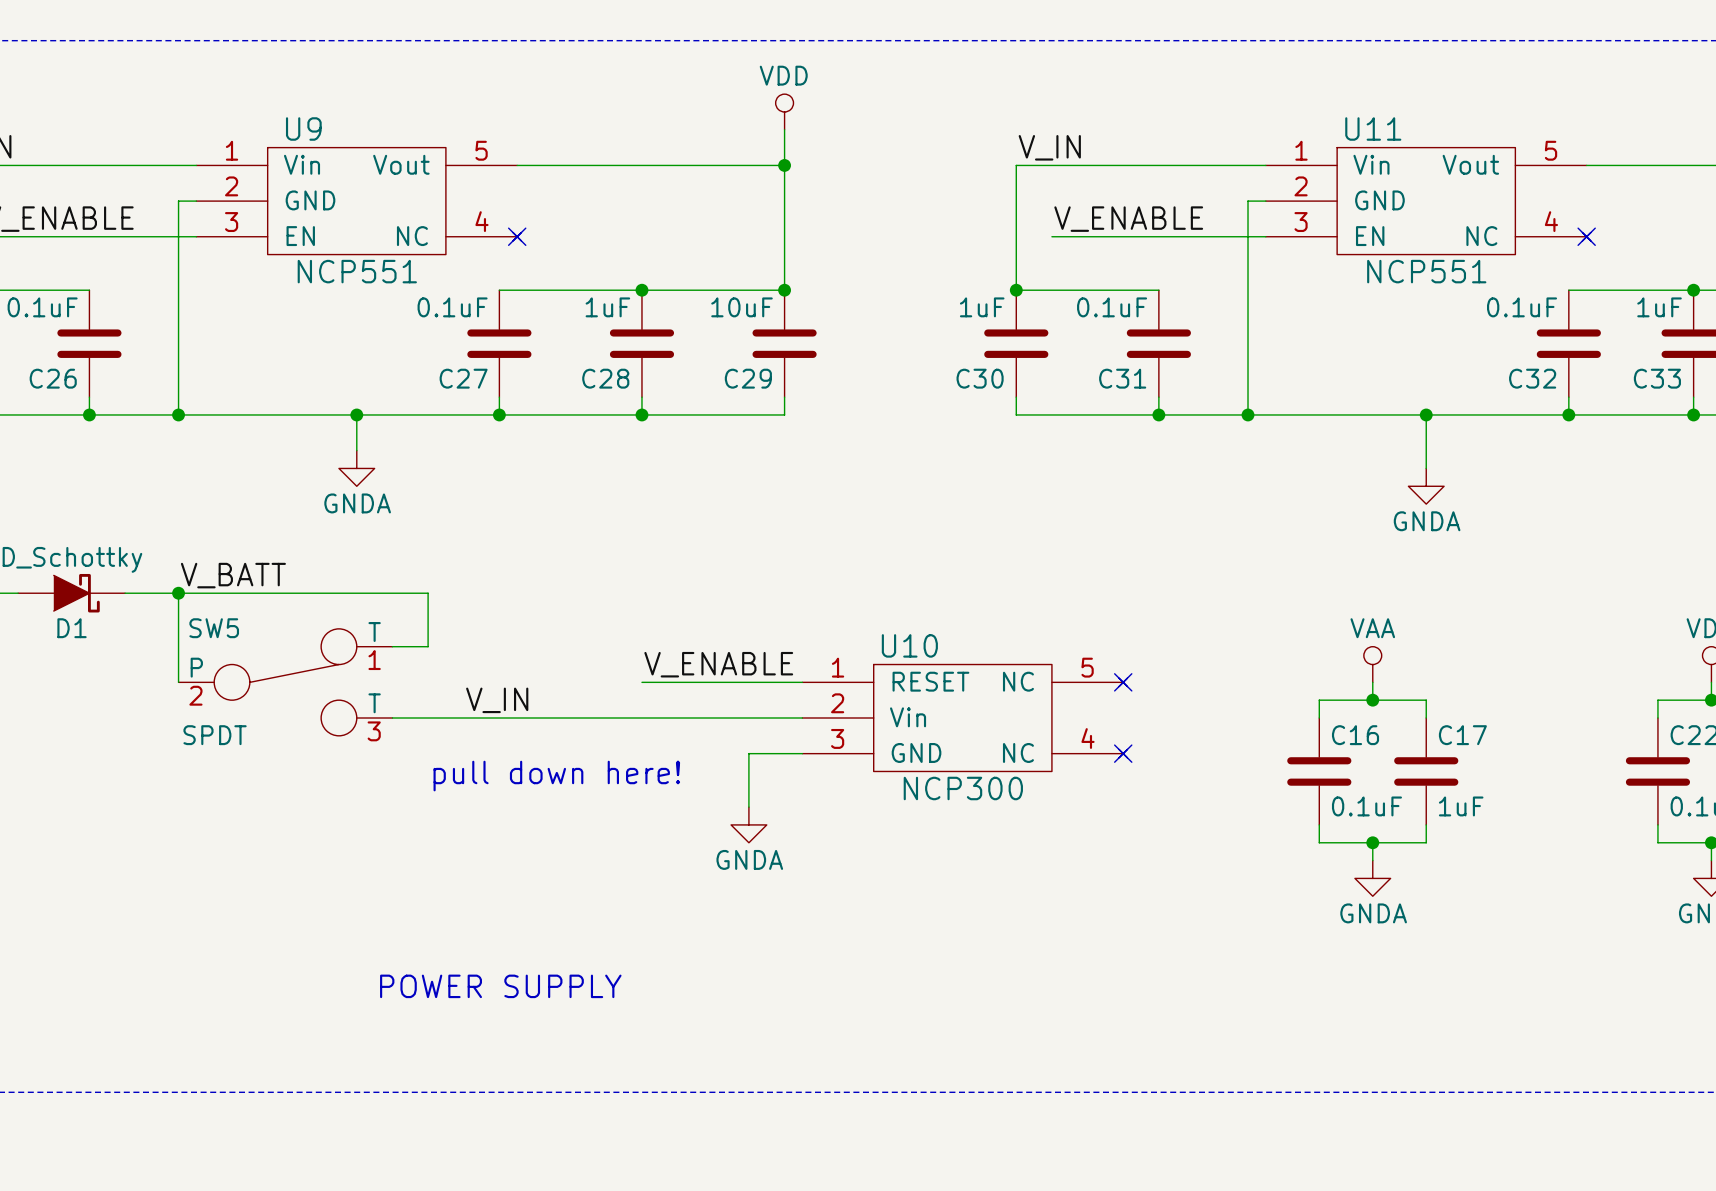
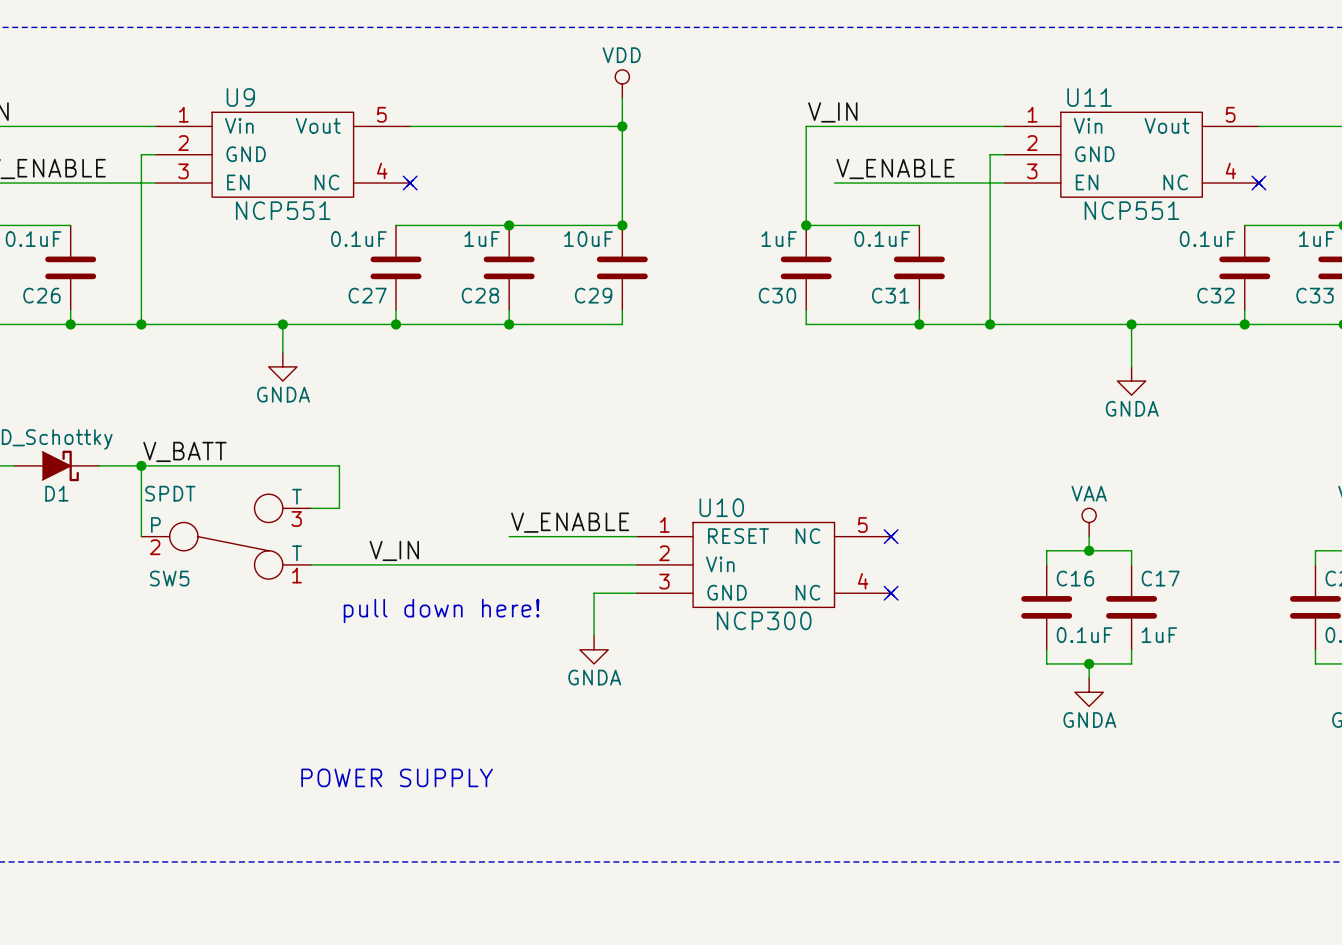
SW5 flip: as is (285, 682) -> up-down (226, 536)

